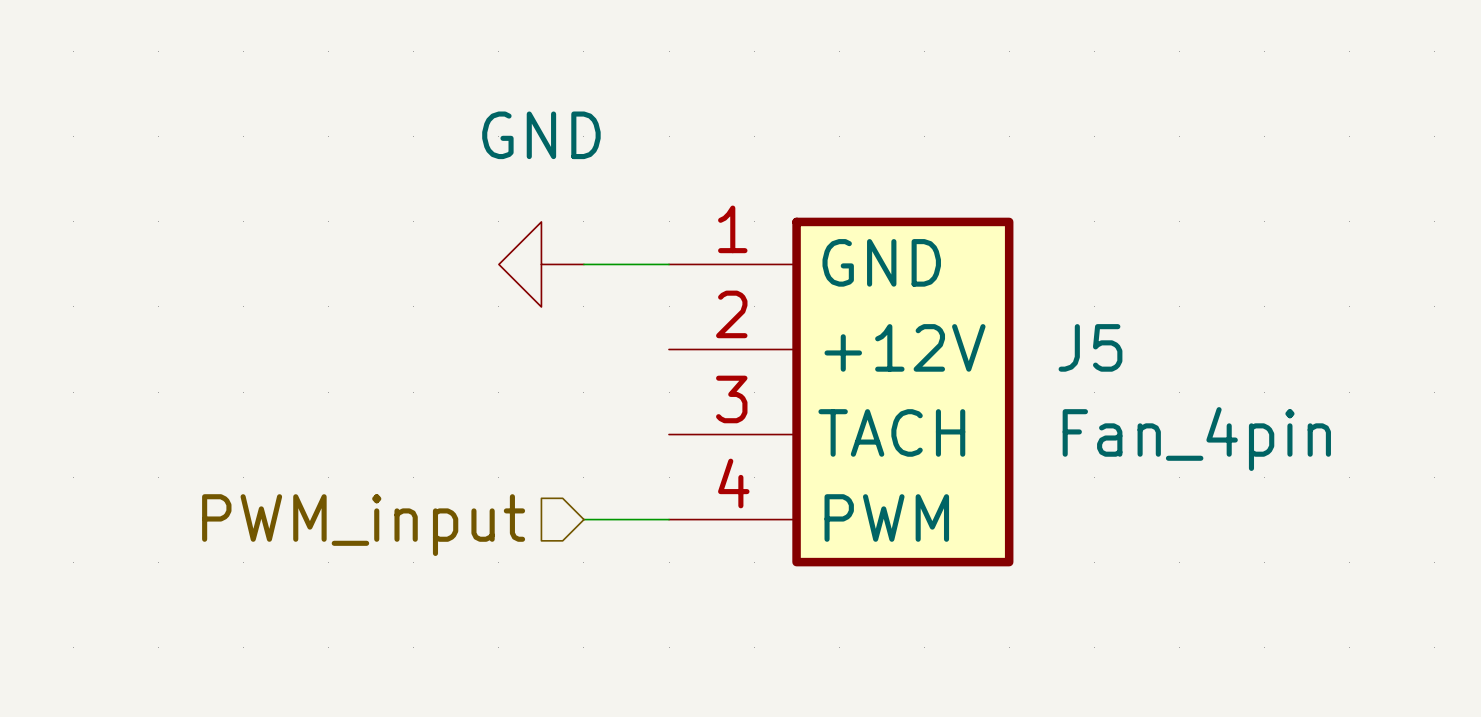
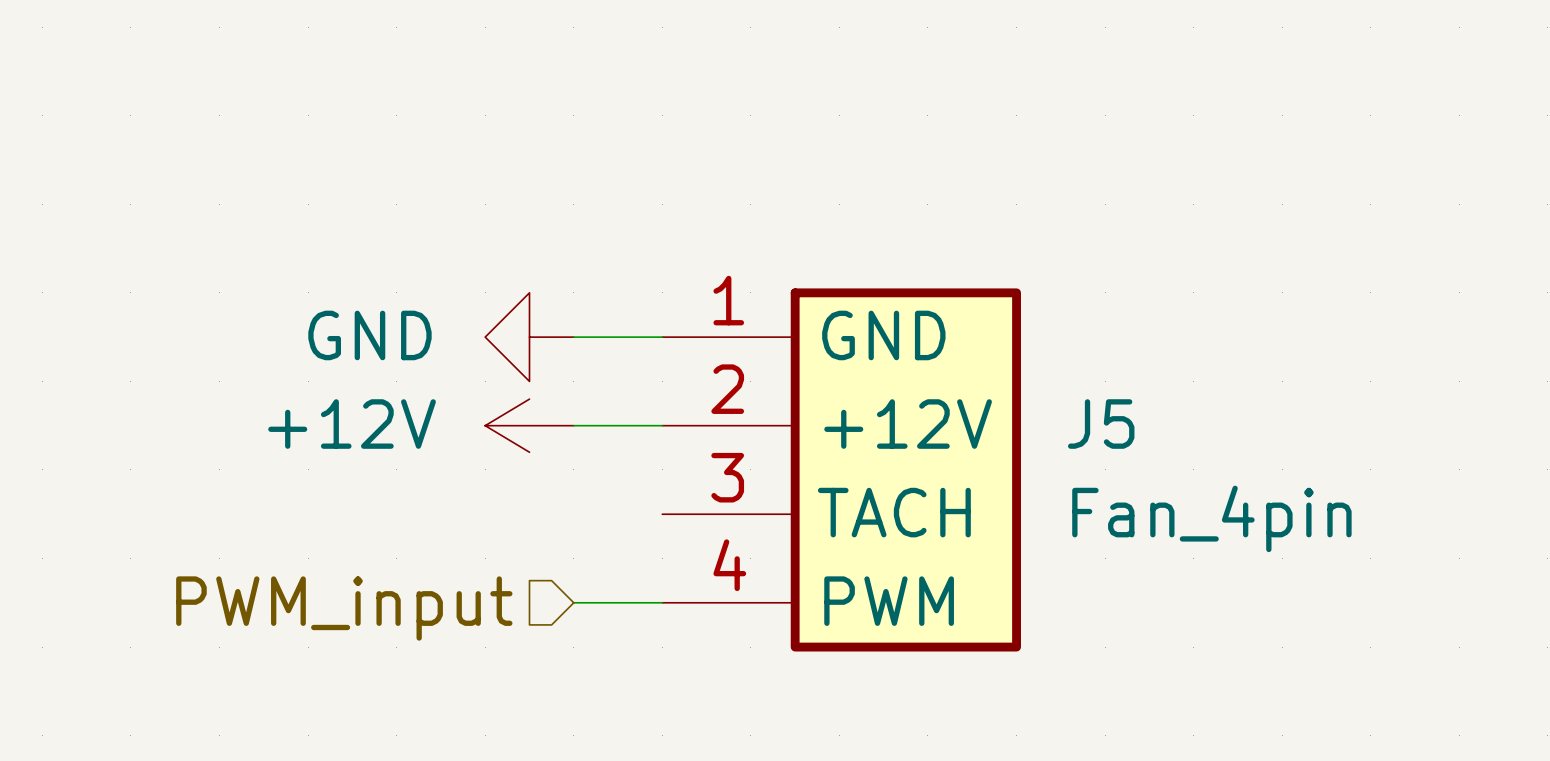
power symbol text position: GND (541, 135) -> GND (369, 335)
power symbol: none -> +12V (529, 425)
wire: none -> (573, 425) (662, 425)

